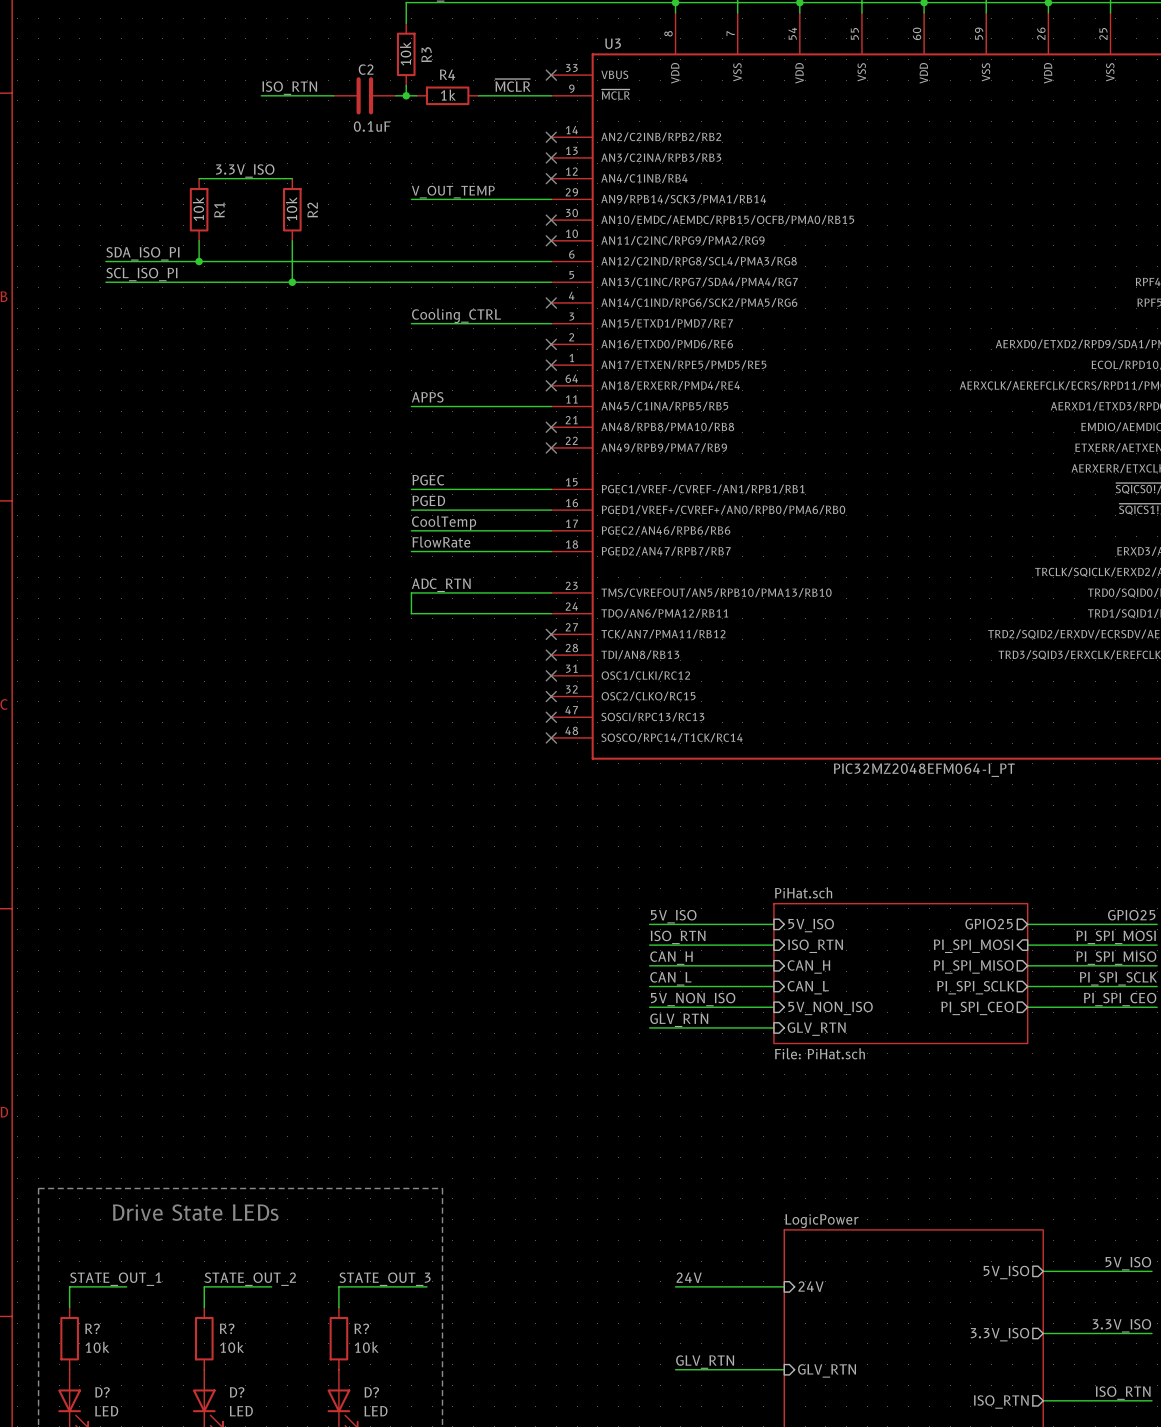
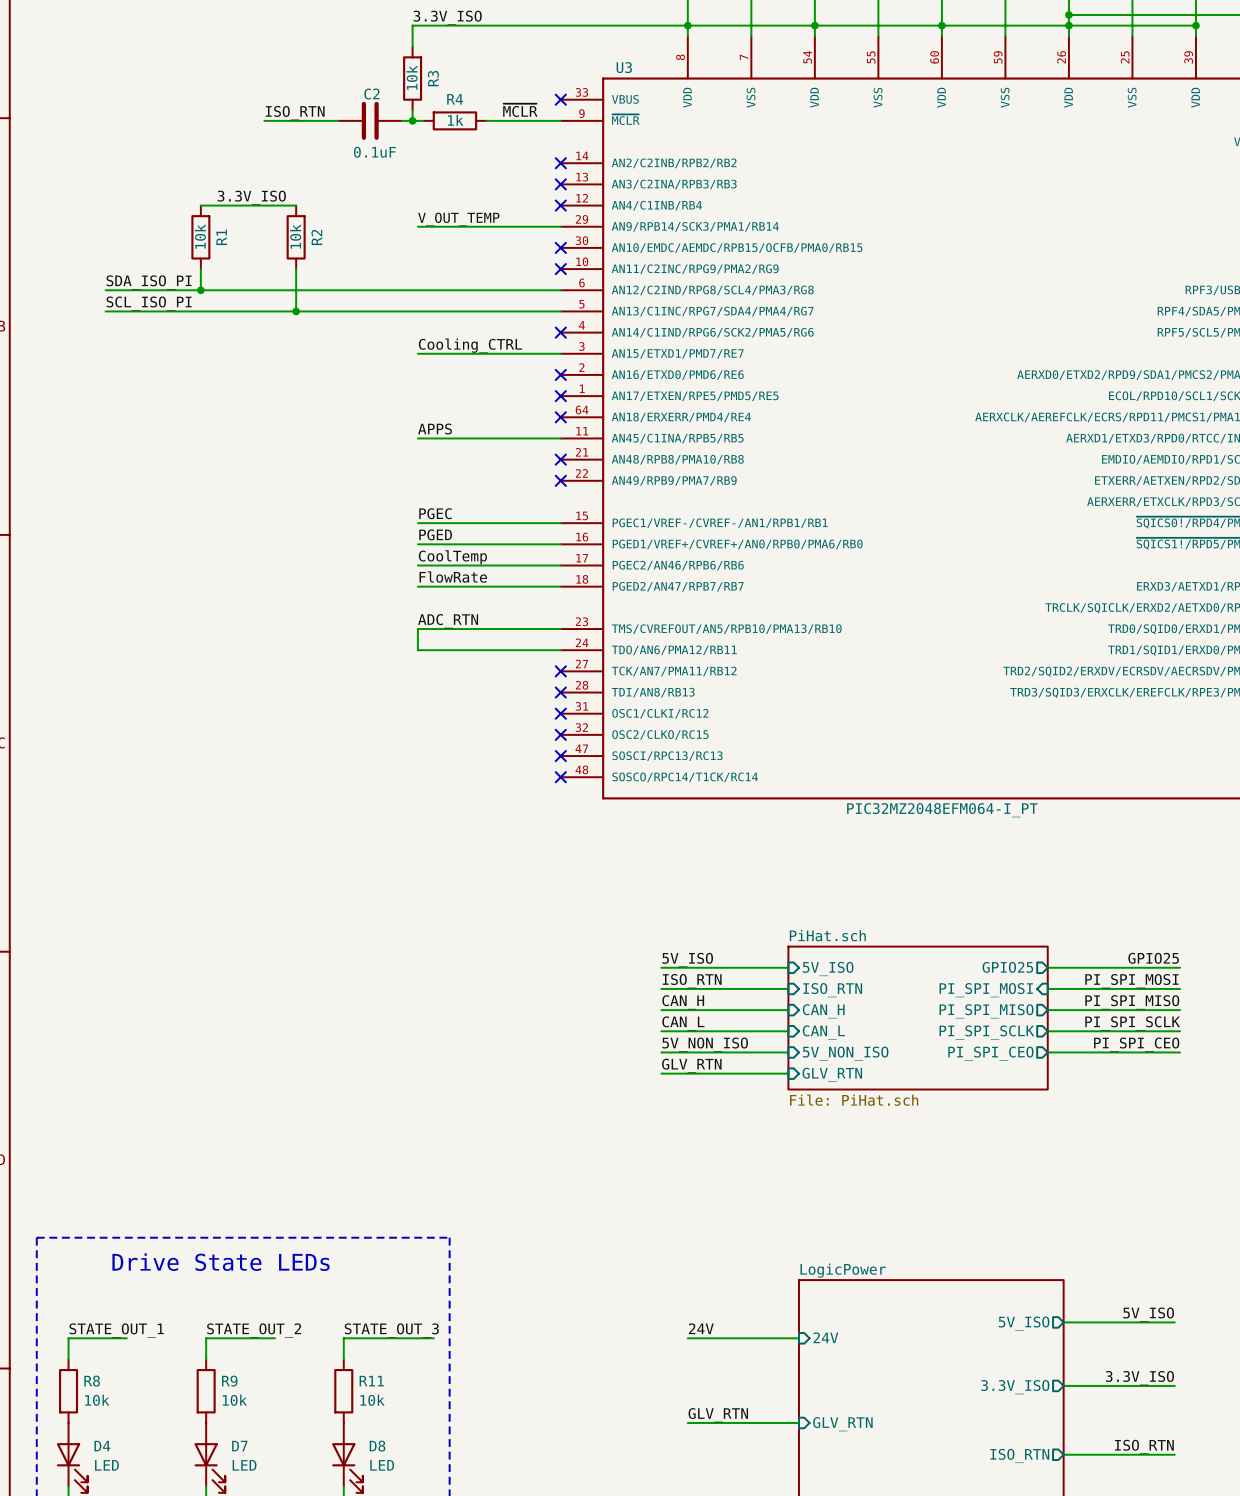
R? name: R? (92, 1328) -> R8 (92, 1381)
R? name: R? (227, 1328) -> R9 (229, 1381)
R? name: R? (361, 1328) -> R11 (371, 1381)
D? name: D? (102, 1392) -> D4 (102, 1446)
D? name: D? (237, 1392) -> D7 (239, 1446)
D? name: D? (371, 1392) -> D8 (377, 1446)

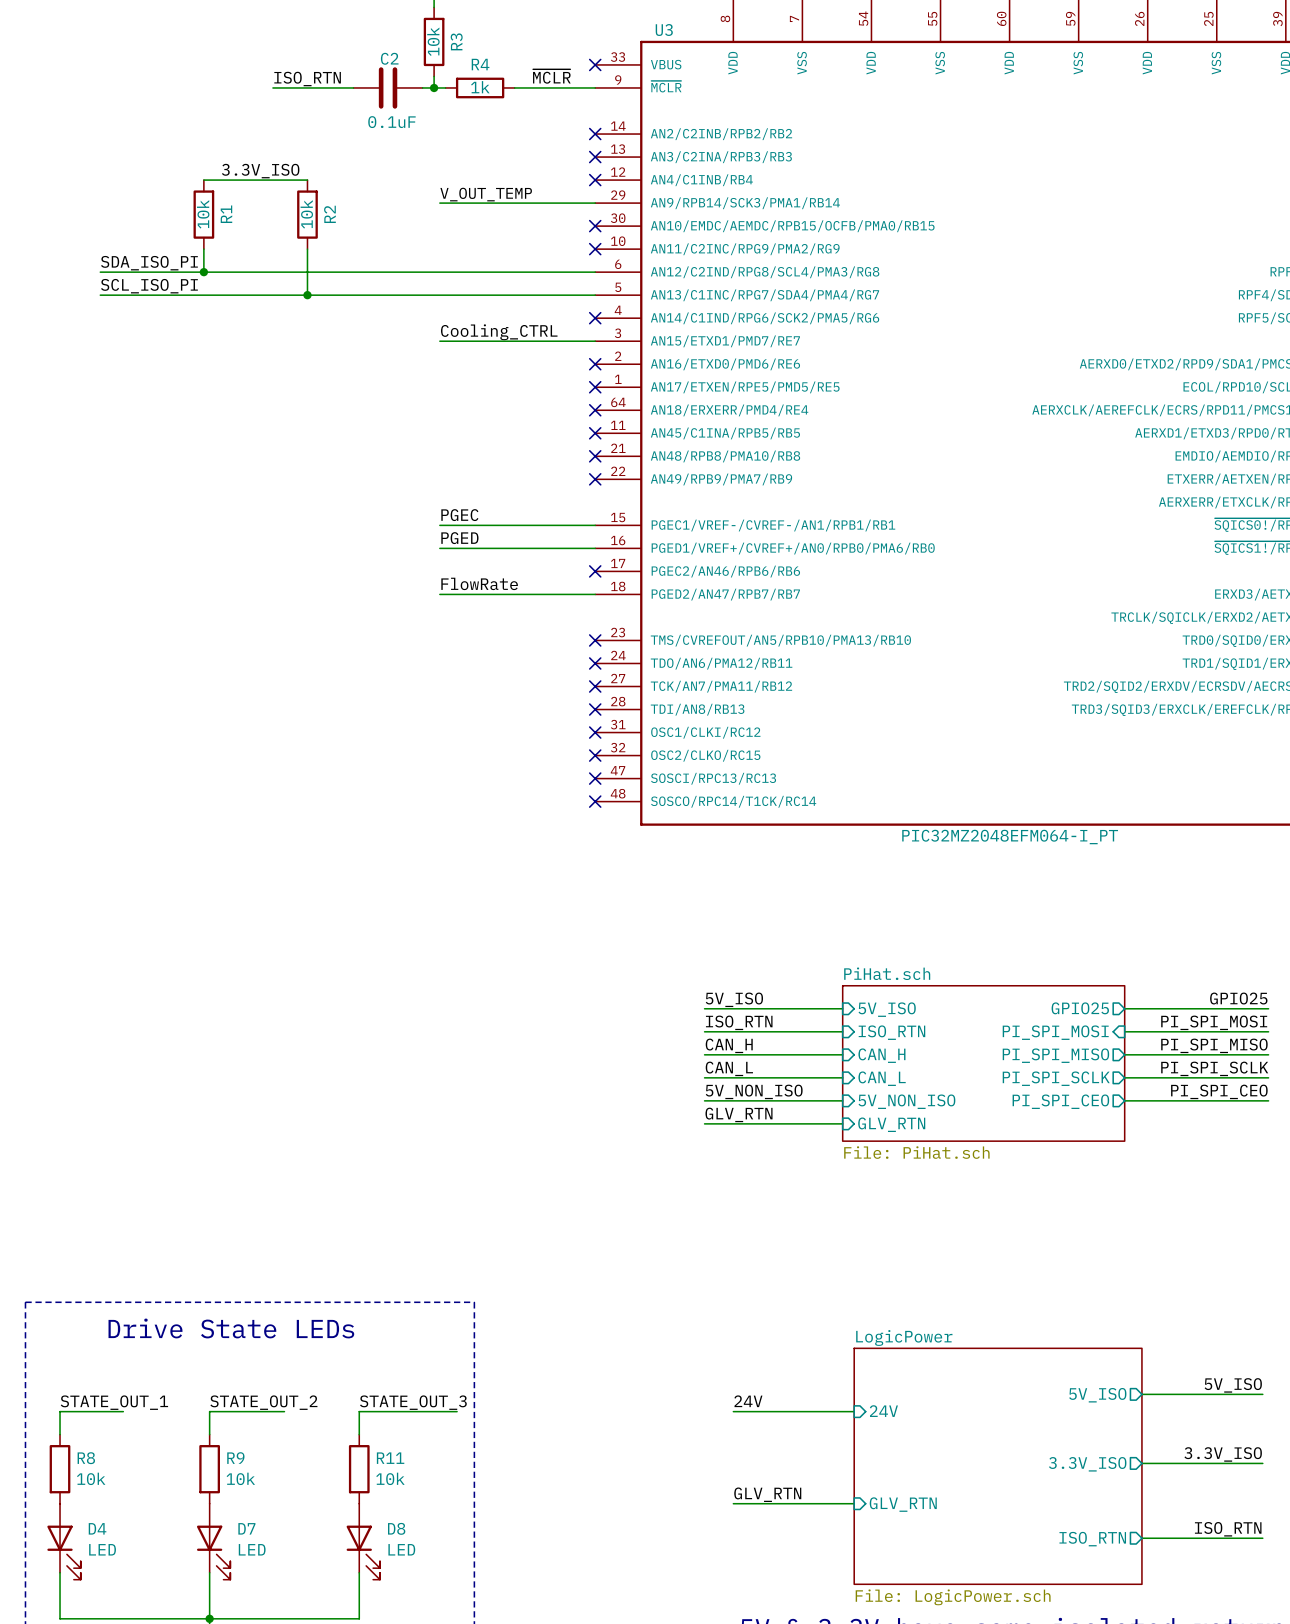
label: APPS (435, 429) -> none
wire: (417, 438) (560, 438) -> none
no-connect mark: none -> (595, 433)
label: CoolTemp (452, 557) -> none
wire: (417, 565) (560, 565) -> none
no-connect mark: none -> (595, 571)
label: ADC_RTN (448, 621) -> none
wire: (560, 629) (417, 629) (417, 650) (560, 650) -> none
no-connect mark: none -> (595, 640)
no-connect mark: none -> (595, 663)

